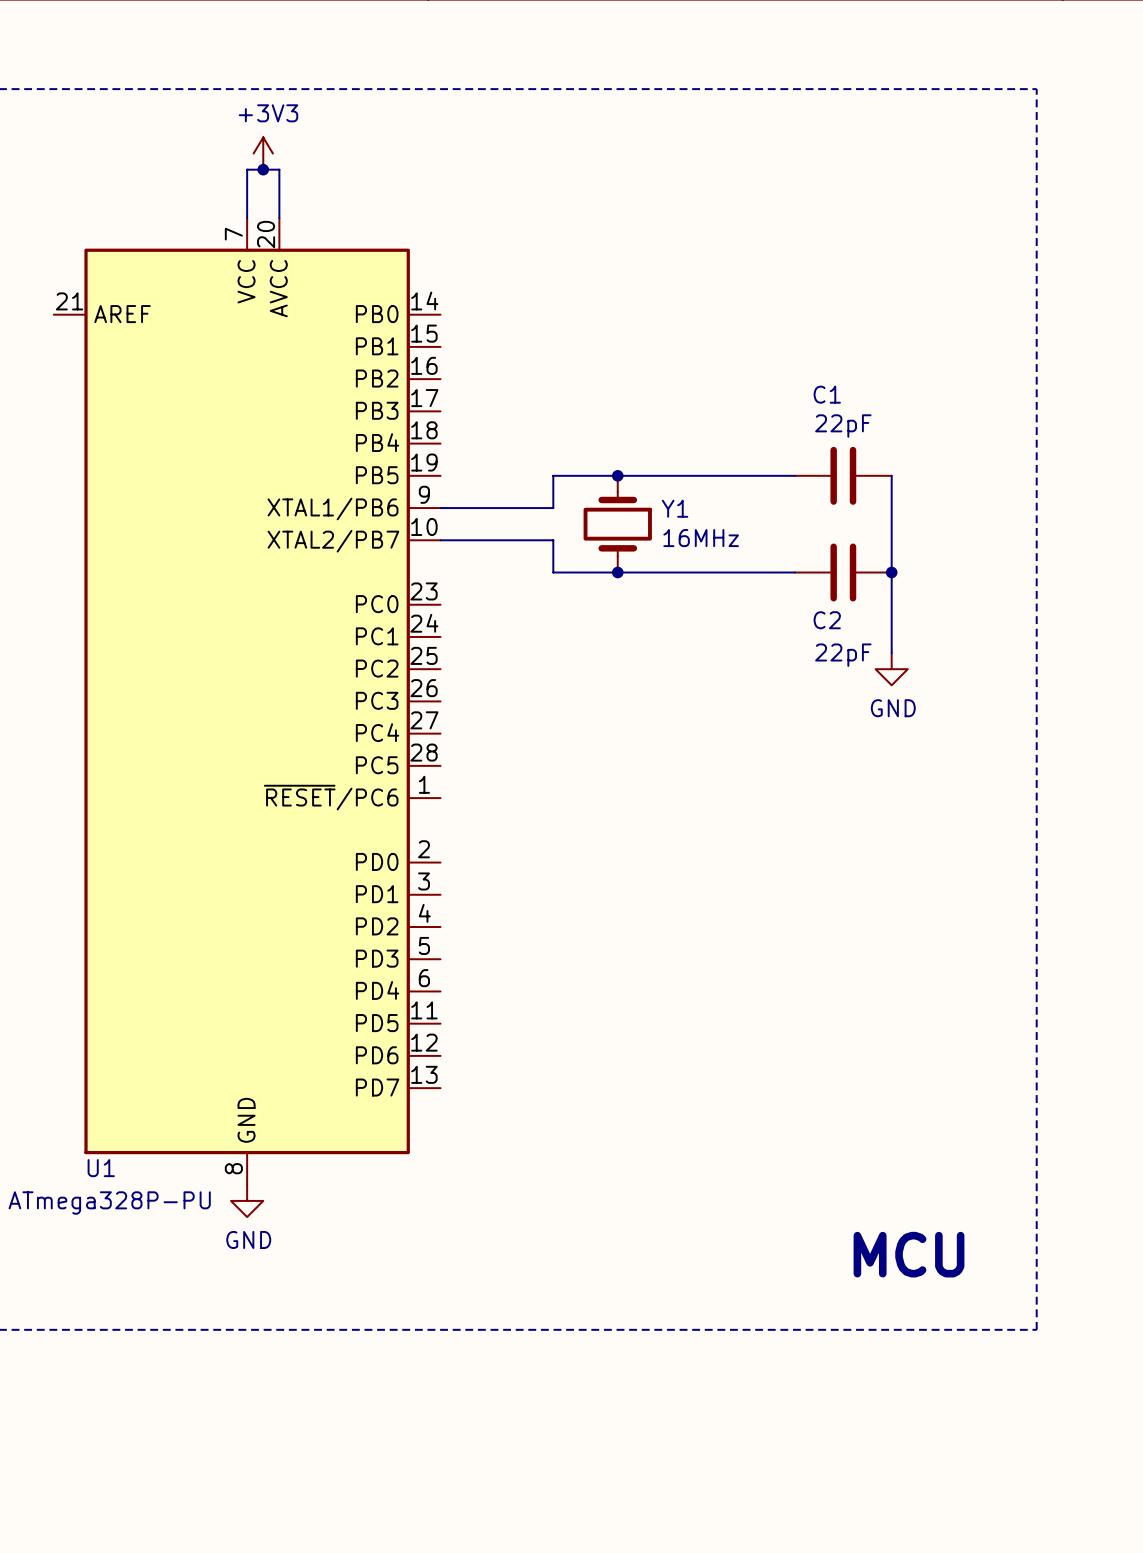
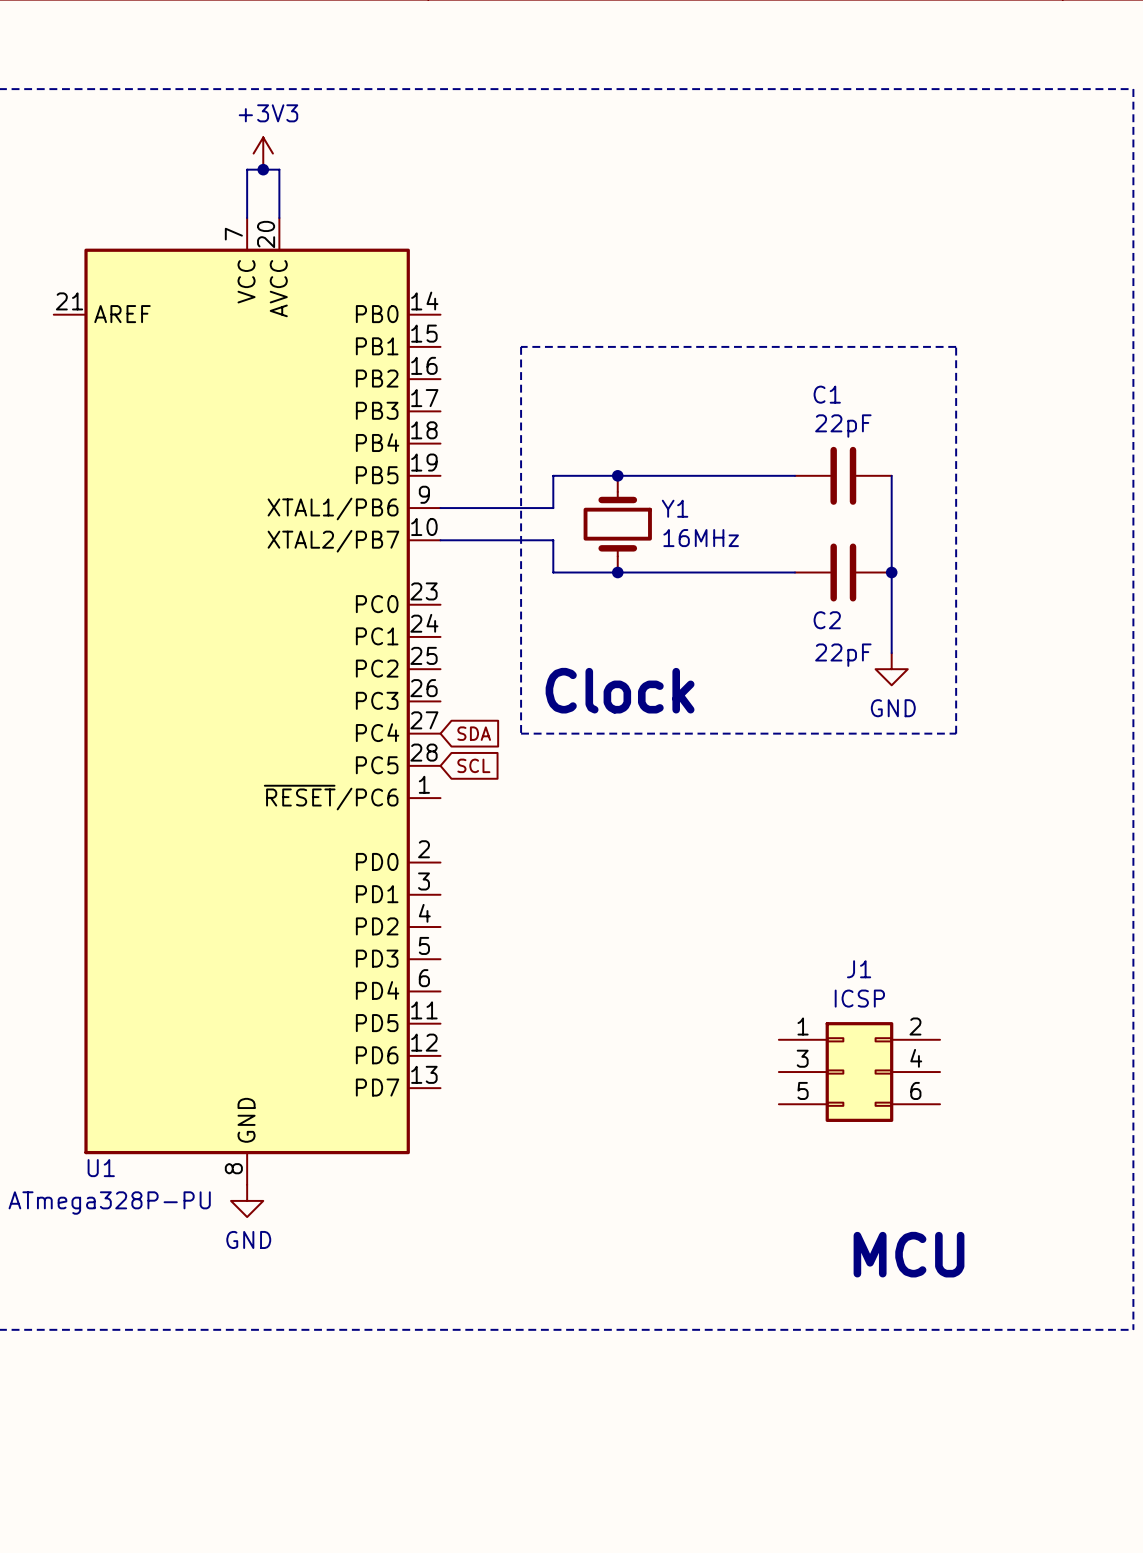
line: (1036, 89) (1036, 1329) -> (1036, 89) (1133, 89) (1133, 1329) (1036, 1329)
line: none -> (521, 346) (521, 733) (956, 733) (956, 346) (521, 346)
text: none -> Clock (620, 690)
global label: none -> SDA (474, 733)
global label: none -> SCL (473, 765)
J1: none -> ICSP (859, 1072)

